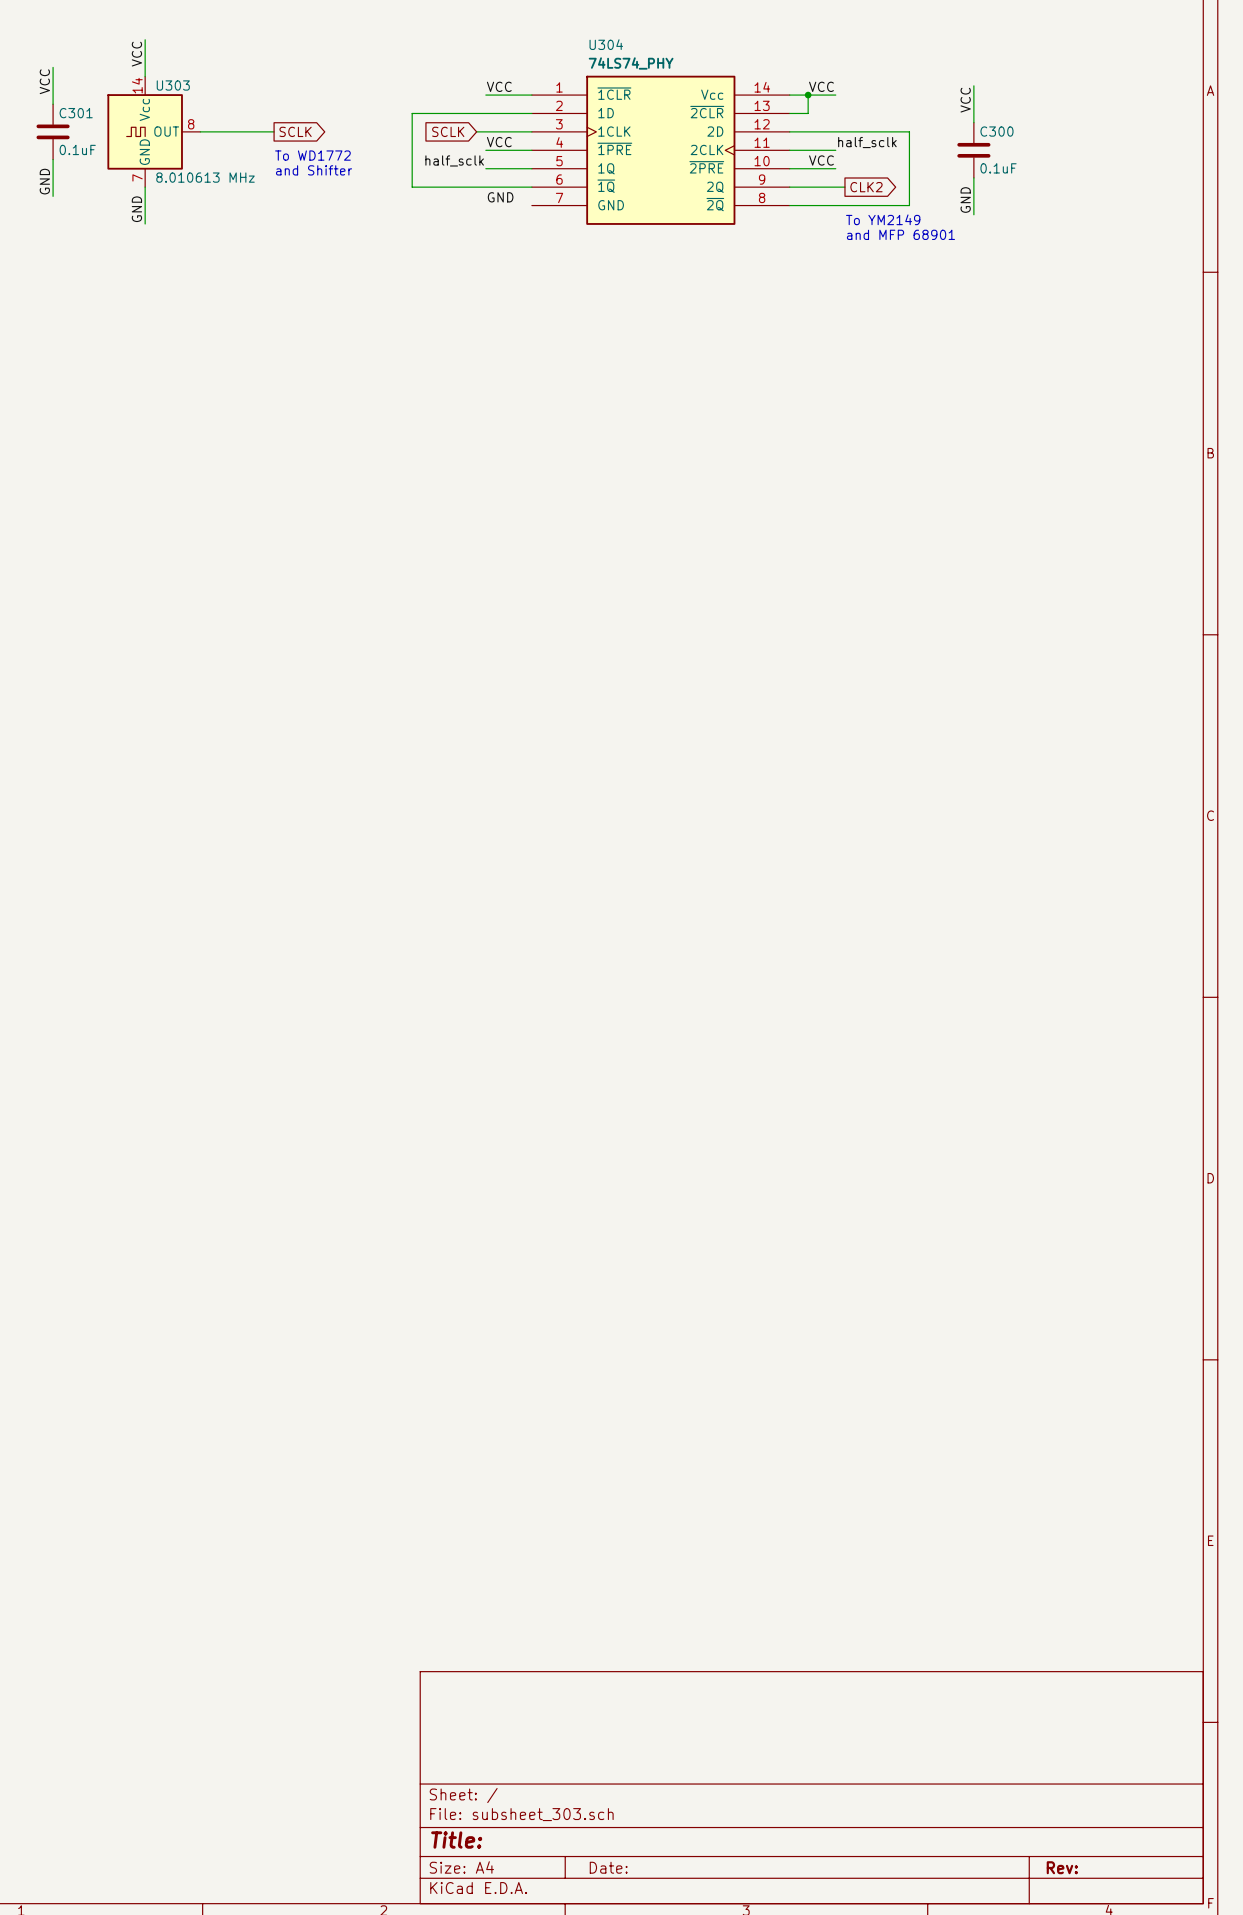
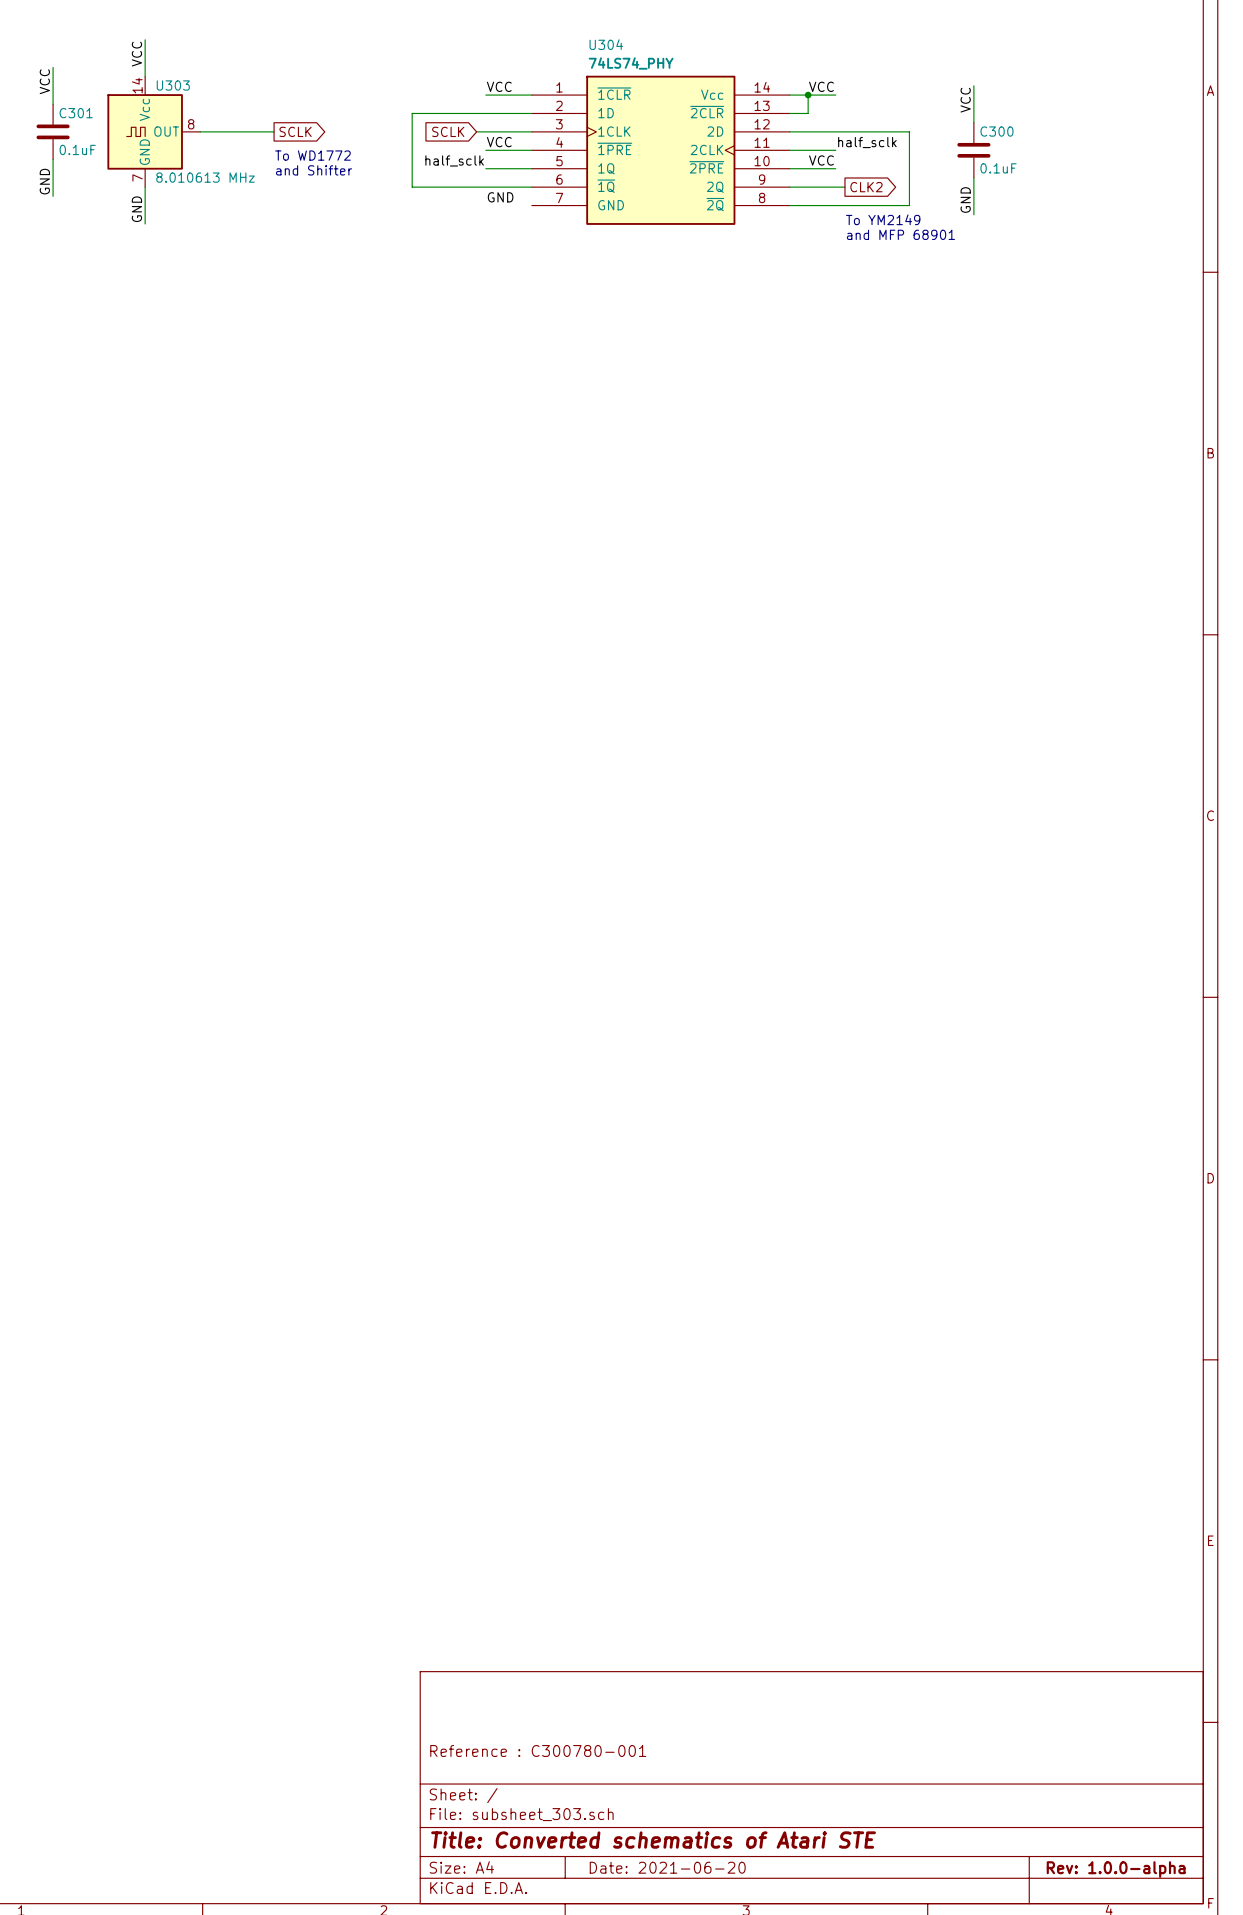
title block: none -> Reference : C300780-001 (538, 1750)
title block: Title: (456, 1840) -> Title: Converted schematics of Atari STE (653, 1840)
title block: Date: (608, 1867) -> Date: 2021-06-20 (667, 1867)
title block: Rev: (1062, 1867) -> Rev: 1.0.0-alpha (1116, 1869)

